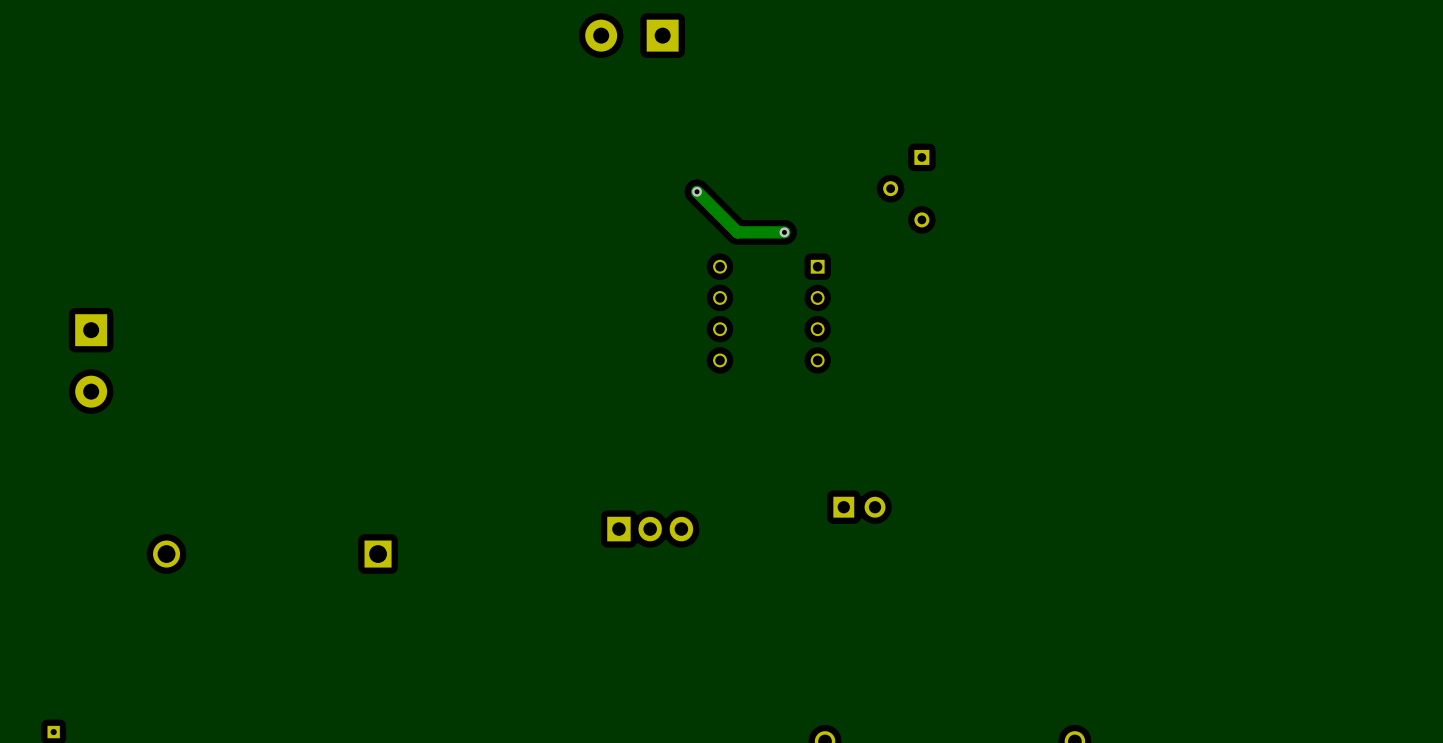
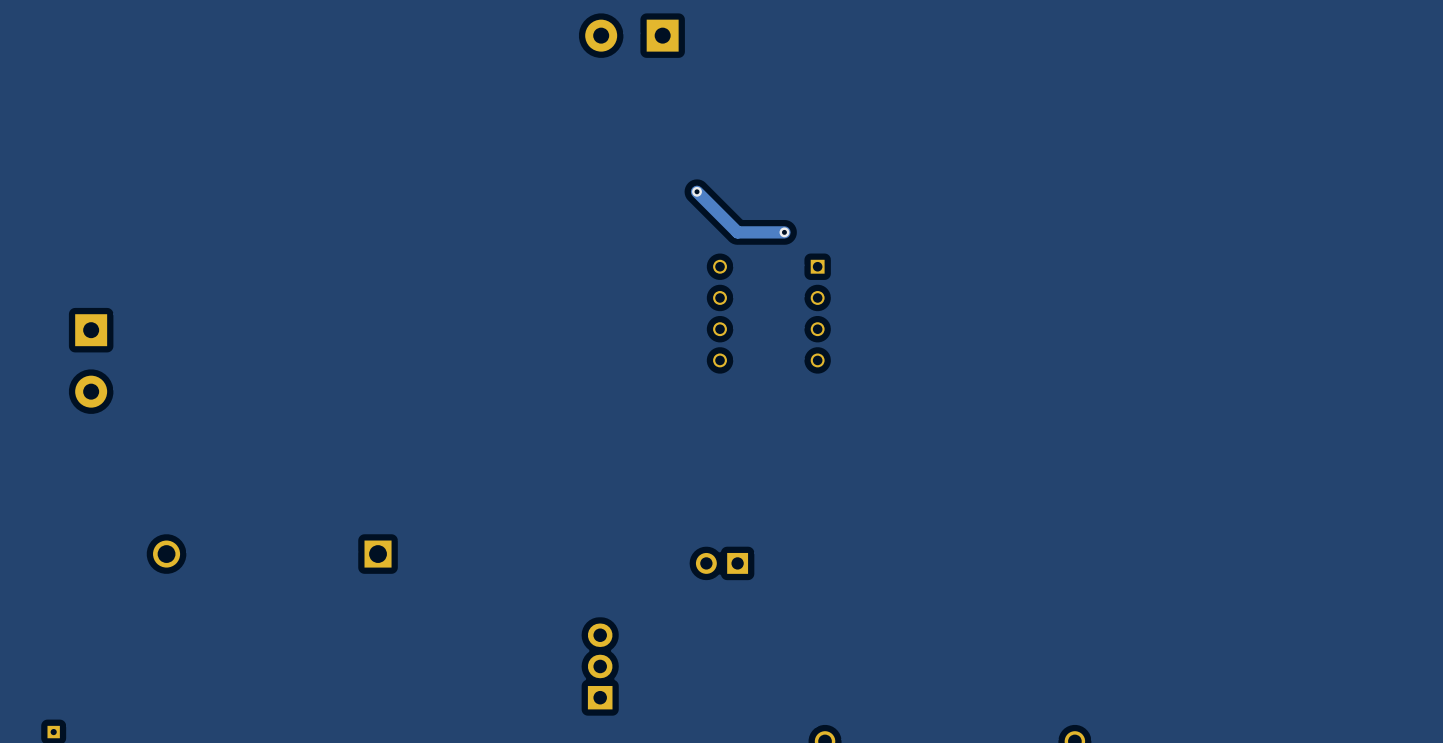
part: (906, 188) -> none
part rotation: 0° (859, 507) -> 180° (721, 563)
part position: (859, 507) -> (721, 563)
part rotation: 0° (650, 529) -> 90° counterclockwise (600, 666)
part position: (650, 529) -> (600, 666)

